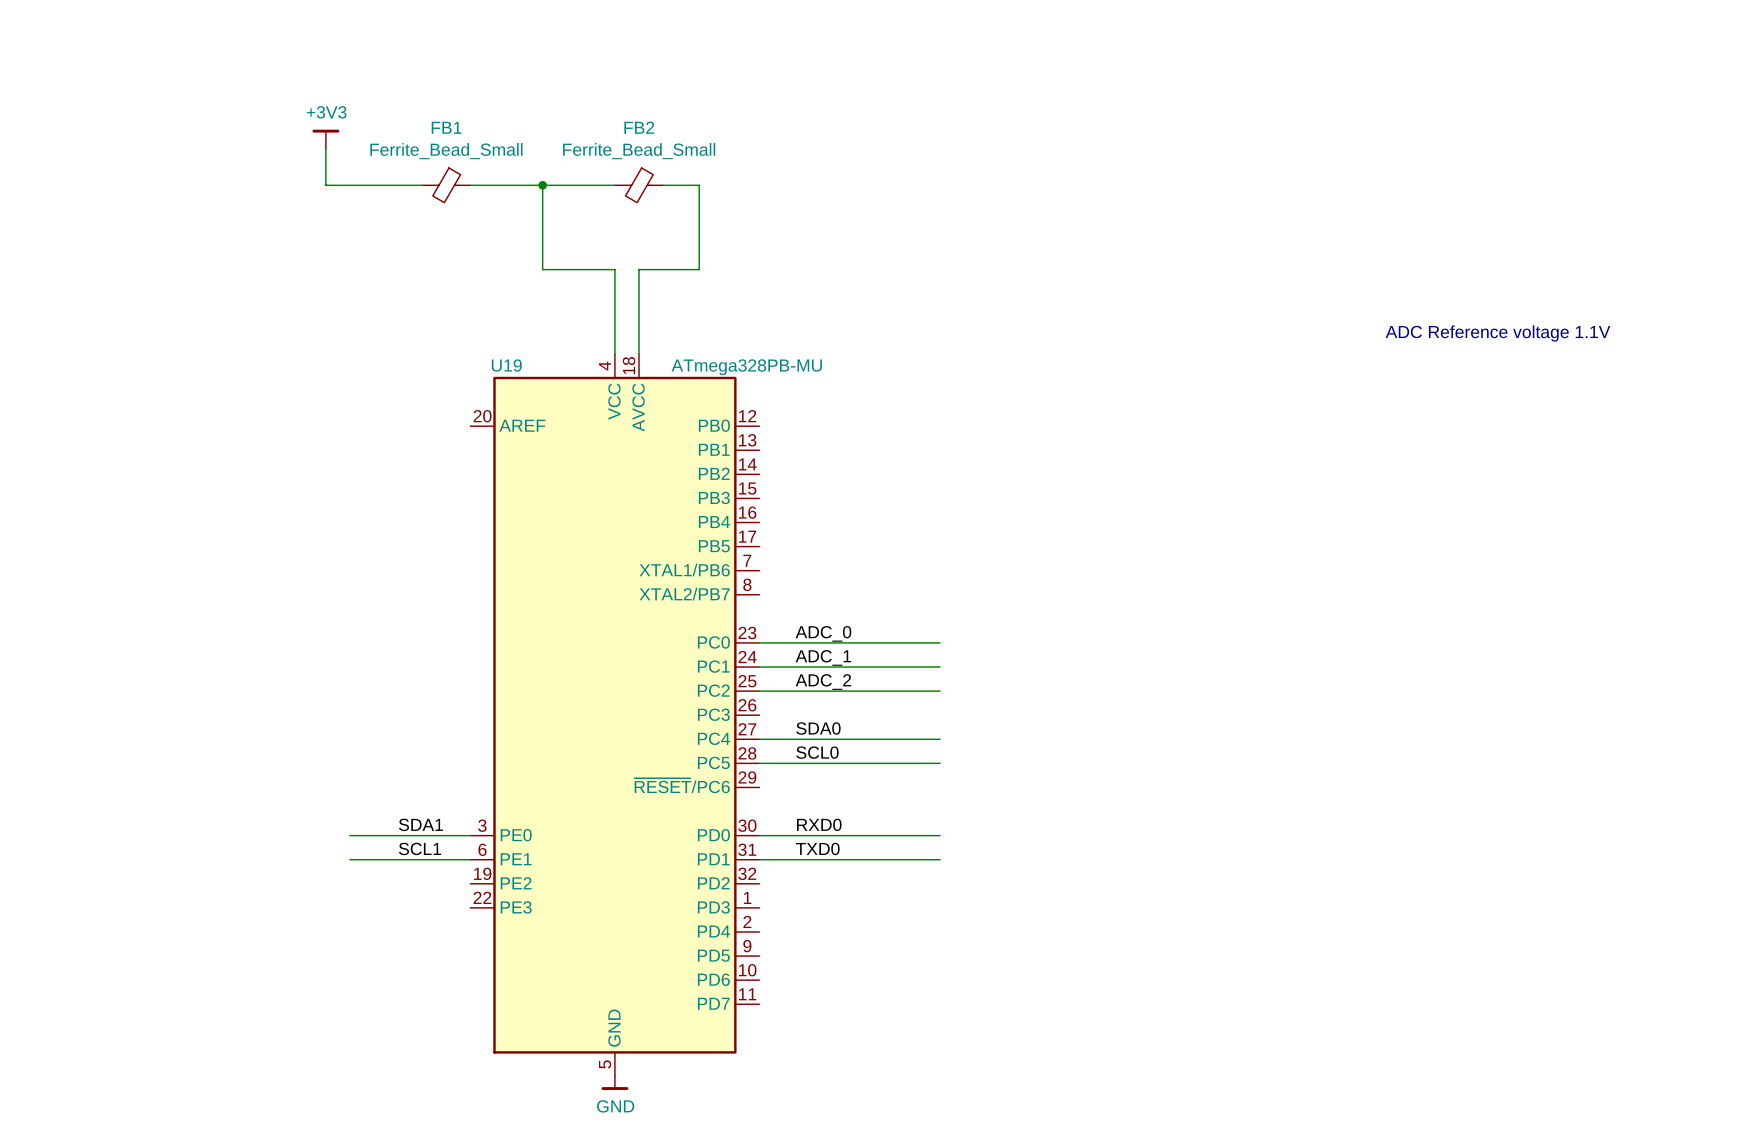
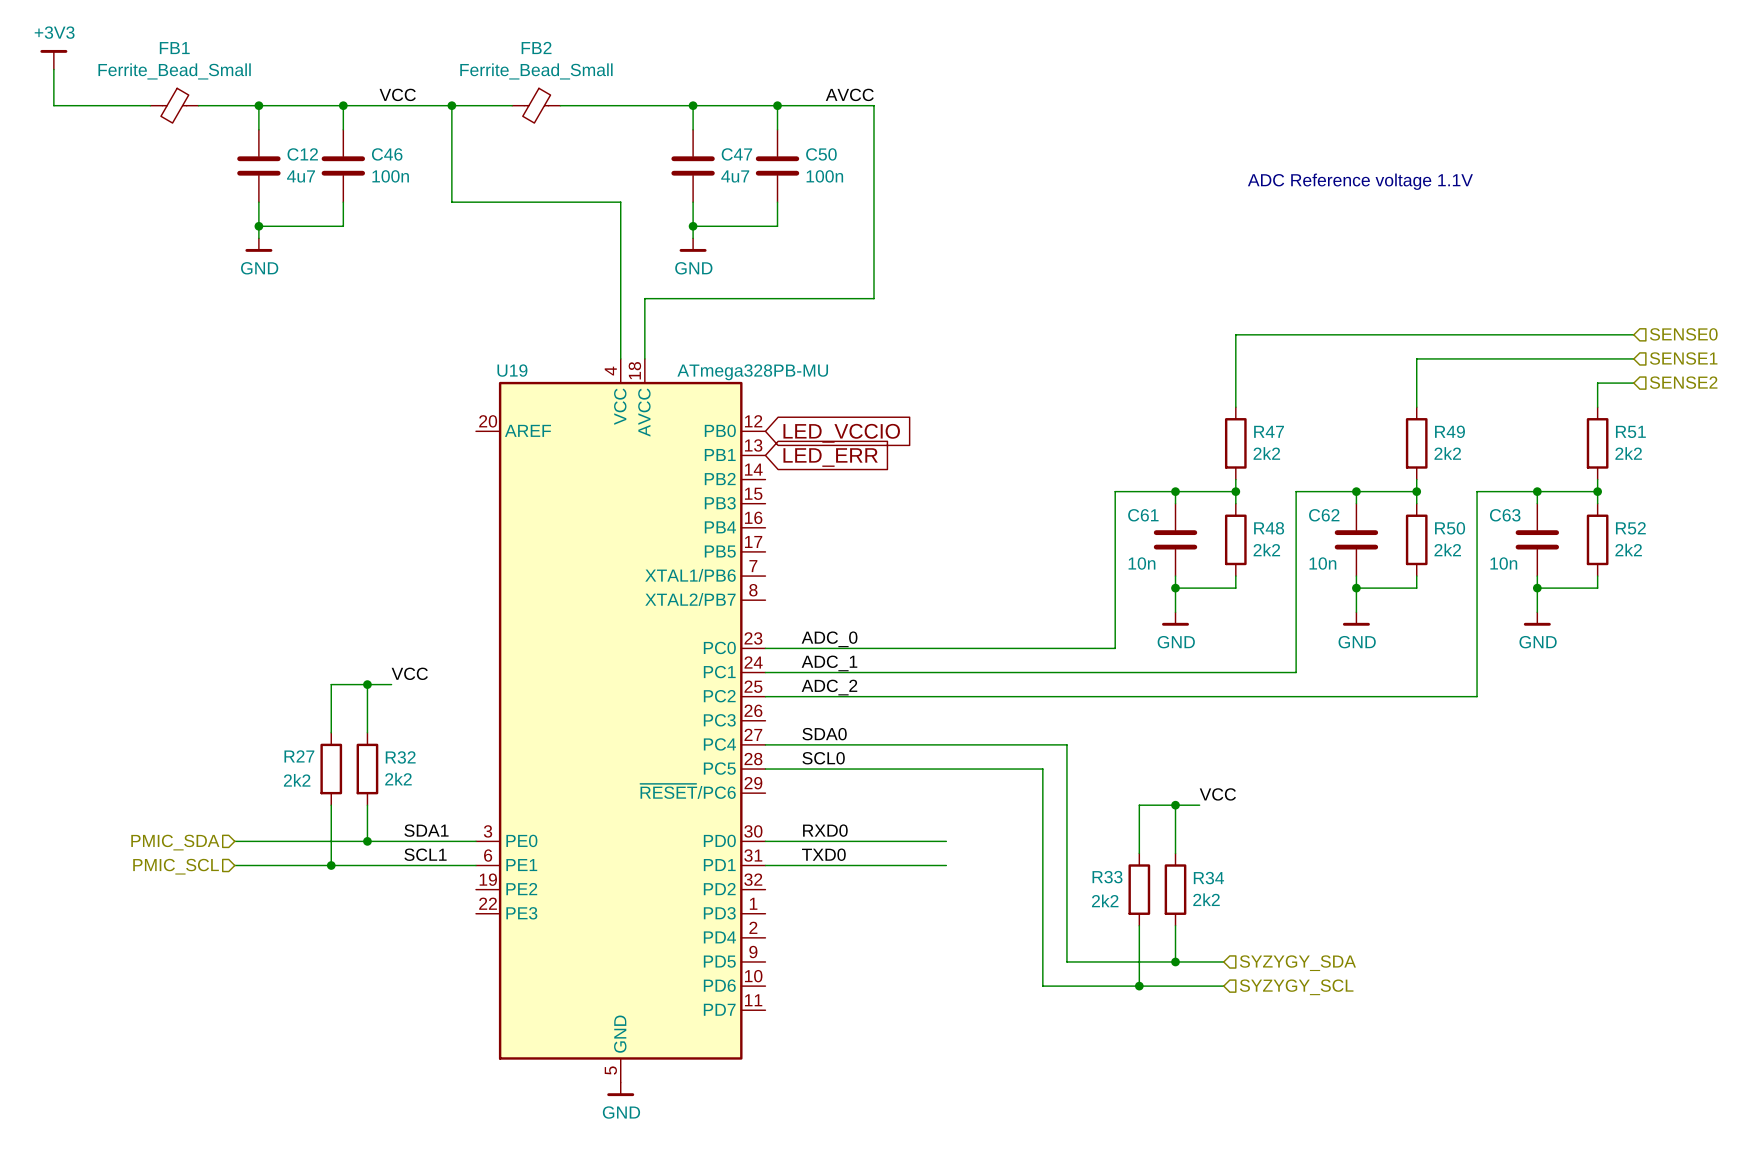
power symbol: none -> +3V3 (53, 59)
wire: none -> (53, 69) (53, 105) (150, 105)
label: none -> VCC (397, 94)
label: none -> AVCC (849, 94)
wire: none -> (198, 105) (512, 105)
wire: none -> (258, 105) (258, 129)
junction: none -> (258, 105)
wire: none -> (343, 105) (343, 129)
junction: none -> (343, 105)
junction: none -> (451, 105)
wire: none -> (693, 105) (693, 129)
junction: none -> (693, 105)
wire: none -> (777, 105) (777, 129)
junction: none -> (777, 105)
power symbol: +3V3 (325, 139) -> none
wire: (325, 149) (325, 185) (422, 185) -> none
C12: none -> 4u7 (258, 165)
C46: none -> 100n (343, 165)
C47: none -> 4u7 (693, 165)
C50: none -> 100n (777, 165)
FB1 position: (446, 185) -> (174, 105)
wire: (470, 185) (614, 185) -> none
wire: (542, 185) (542, 269) (614, 269) -> (451, 105) (451, 202) (620, 202) (620, 274)
junction: (542, 185) -> none
FB2 position: (639, 185) -> (536, 105)
wire: (663, 185) (699, 185) (699, 269) (639, 269) (639, 293) -> (560, 105) (873, 105) (873, 298) (644, 298)
wire: none -> (258, 202) (258, 238)
wire: none -> (343, 202) (343, 226) (258, 226)
wire: none -> (693, 202) (693, 238)
wire: none -> (777, 202) (777, 226) (693, 226)
junction: none -> (258, 226)
junction: none -> (693, 226)
power symbol: none -> GND (258, 245)
power symbol: none -> GND (693, 245)
wire: none -> (1633, 334) (1235, 334) (1235, 407)
hierarchical label: none -> SENSE0 (1683, 334)
text position: ADC Reference voltage 1.1V (1498, 333) -> ADC Reference voltage 1.1V (1360, 181)
wire: none -> (1633, 358) (1416, 358) (1416, 407)
hierarchical label: none -> SENSE1 (1683, 358)
hierarchical label: none -> SENSE2 (1683, 382)
wire: none -> (1633, 383) (1597, 383) (1597, 407)
global label: none -> LED_VCCIO (841, 433)
R47: none -> 2k2 (1235, 443)
R49: none -> 2k2 (1416, 443)
R51: none -> 2k2 (1597, 443)
global label: none -> LED_ERR (830, 457)
wire: none -> (1235, 479) (1235, 503)
wire: none -> (1416, 479) (1416, 503)
wire: none -> (1597, 479) (1597, 503)
wire: none -> (1175, 491) (1175, 503)
junction: none -> (1175, 491)
wire: none -> (1235, 491) (1115, 491) (1115, 648) (946, 648)
junction: none -> (1235, 491)
wire: none -> (1356, 491) (1356, 503)
junction: none -> (1356, 491)
wire: none -> (1416, 491) (1296, 491) (1296, 672) (946, 672)
junction: none -> (1416, 491)
wire: none -> (1537, 491) (1537, 503)
junction: none -> (1537, 491)
wire: none -> (1597, 491) (1477, 491) (1477, 696) (946, 696)
junction: none -> (1597, 491)
C61: none -> 10n (1175, 539)
R48: none -> 2k2 (1235, 539)
C62: none -> 10n (1356, 539)
R50: none -> 2k2 (1416, 539)
C63: none -> 10n (1537, 539)
R52: none -> 2k2 (1597, 539)
wire: none -> (1175, 576) (1175, 612)
wire: none -> (1235, 576) (1235, 588) (1175, 588)
wire: none -> (1356, 576) (1356, 612)
wire: none -> (1416, 576) (1416, 588) (1356, 588)
wire: none -> (1537, 576) (1537, 612)
wire: none -> (1597, 576) (1597, 588) (1537, 588)
junction: none -> (1175, 588)
junction: none -> (1356, 588)
junction: none -> (1537, 588)
power symbol: none -> GND (1175, 618)
power symbol: none -> GND (1356, 618)
power symbol: none -> GND (1537, 618)
label: none -> VCC (409, 673)
wire: none -> (367, 684) (367, 732)
junction: none -> (367, 684)
wire: none -> (391, 684) (331, 684) (331, 732)
wire: none -> (946, 744) (1066, 744) (1066, 961) (1223, 961)
R27: none -> 2k2 (331, 769)
R32: none -> 2k2 (367, 769)
wire: none -> (946, 769) (1042, 769) (1042, 986) (1223, 986)
label: none -> VCC (1217, 794)
wire: none -> (331, 805) (331, 865)
wire: none -> (367, 805) (367, 841)
wire: none -> (1175, 805) (1175, 853)
junction: none -> (1175, 805)
wire: none -> (1199, 805) (1139, 805) (1139, 853)
wire: none -> (234, 841) (355, 841)
junction: none -> (367, 841)
hierarchical label: none -> PMIC_SDA (175, 842)
wire: none -> (234, 865) (355, 865)
junction: none -> (331, 865)
hierarchical label: none -> PMIC_SCL (176, 866)
R33: none -> 2k2 (1139, 889)
R34: none -> 2k2 (1175, 889)
wire: none -> (1139, 925) (1139, 986)
wire: none -> (1175, 925) (1175, 961)
junction: none -> (1175, 961)
hierarchical label: none -> SYZYGY_SDA (1297, 963)
junction: none -> (1139, 986)
hierarchical label: none -> SYZYGY_SCL (1296, 987)

